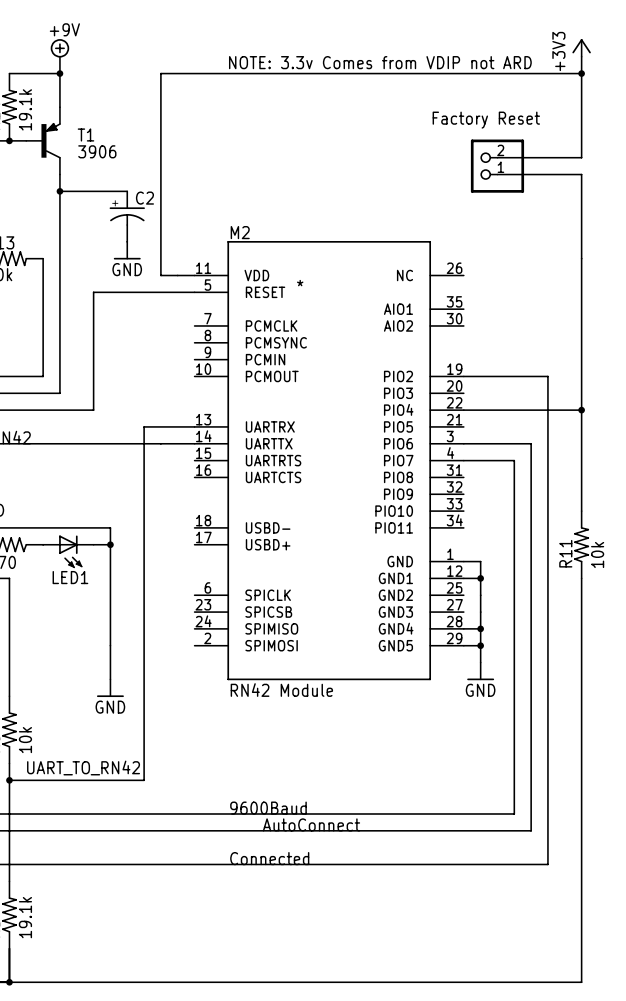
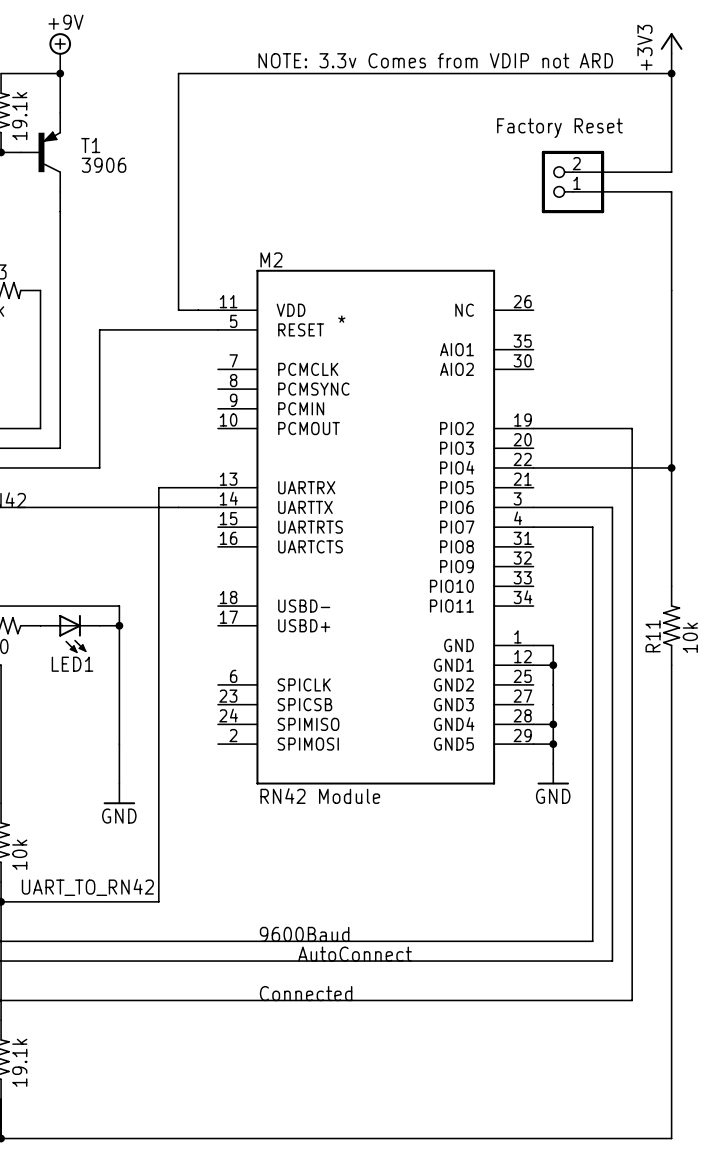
wire: (59, 191) (127, 191) -> none
junction: (59, 191) -> none
C2: (127, 216) -> none
power symbol: GND (127, 250) -> none

